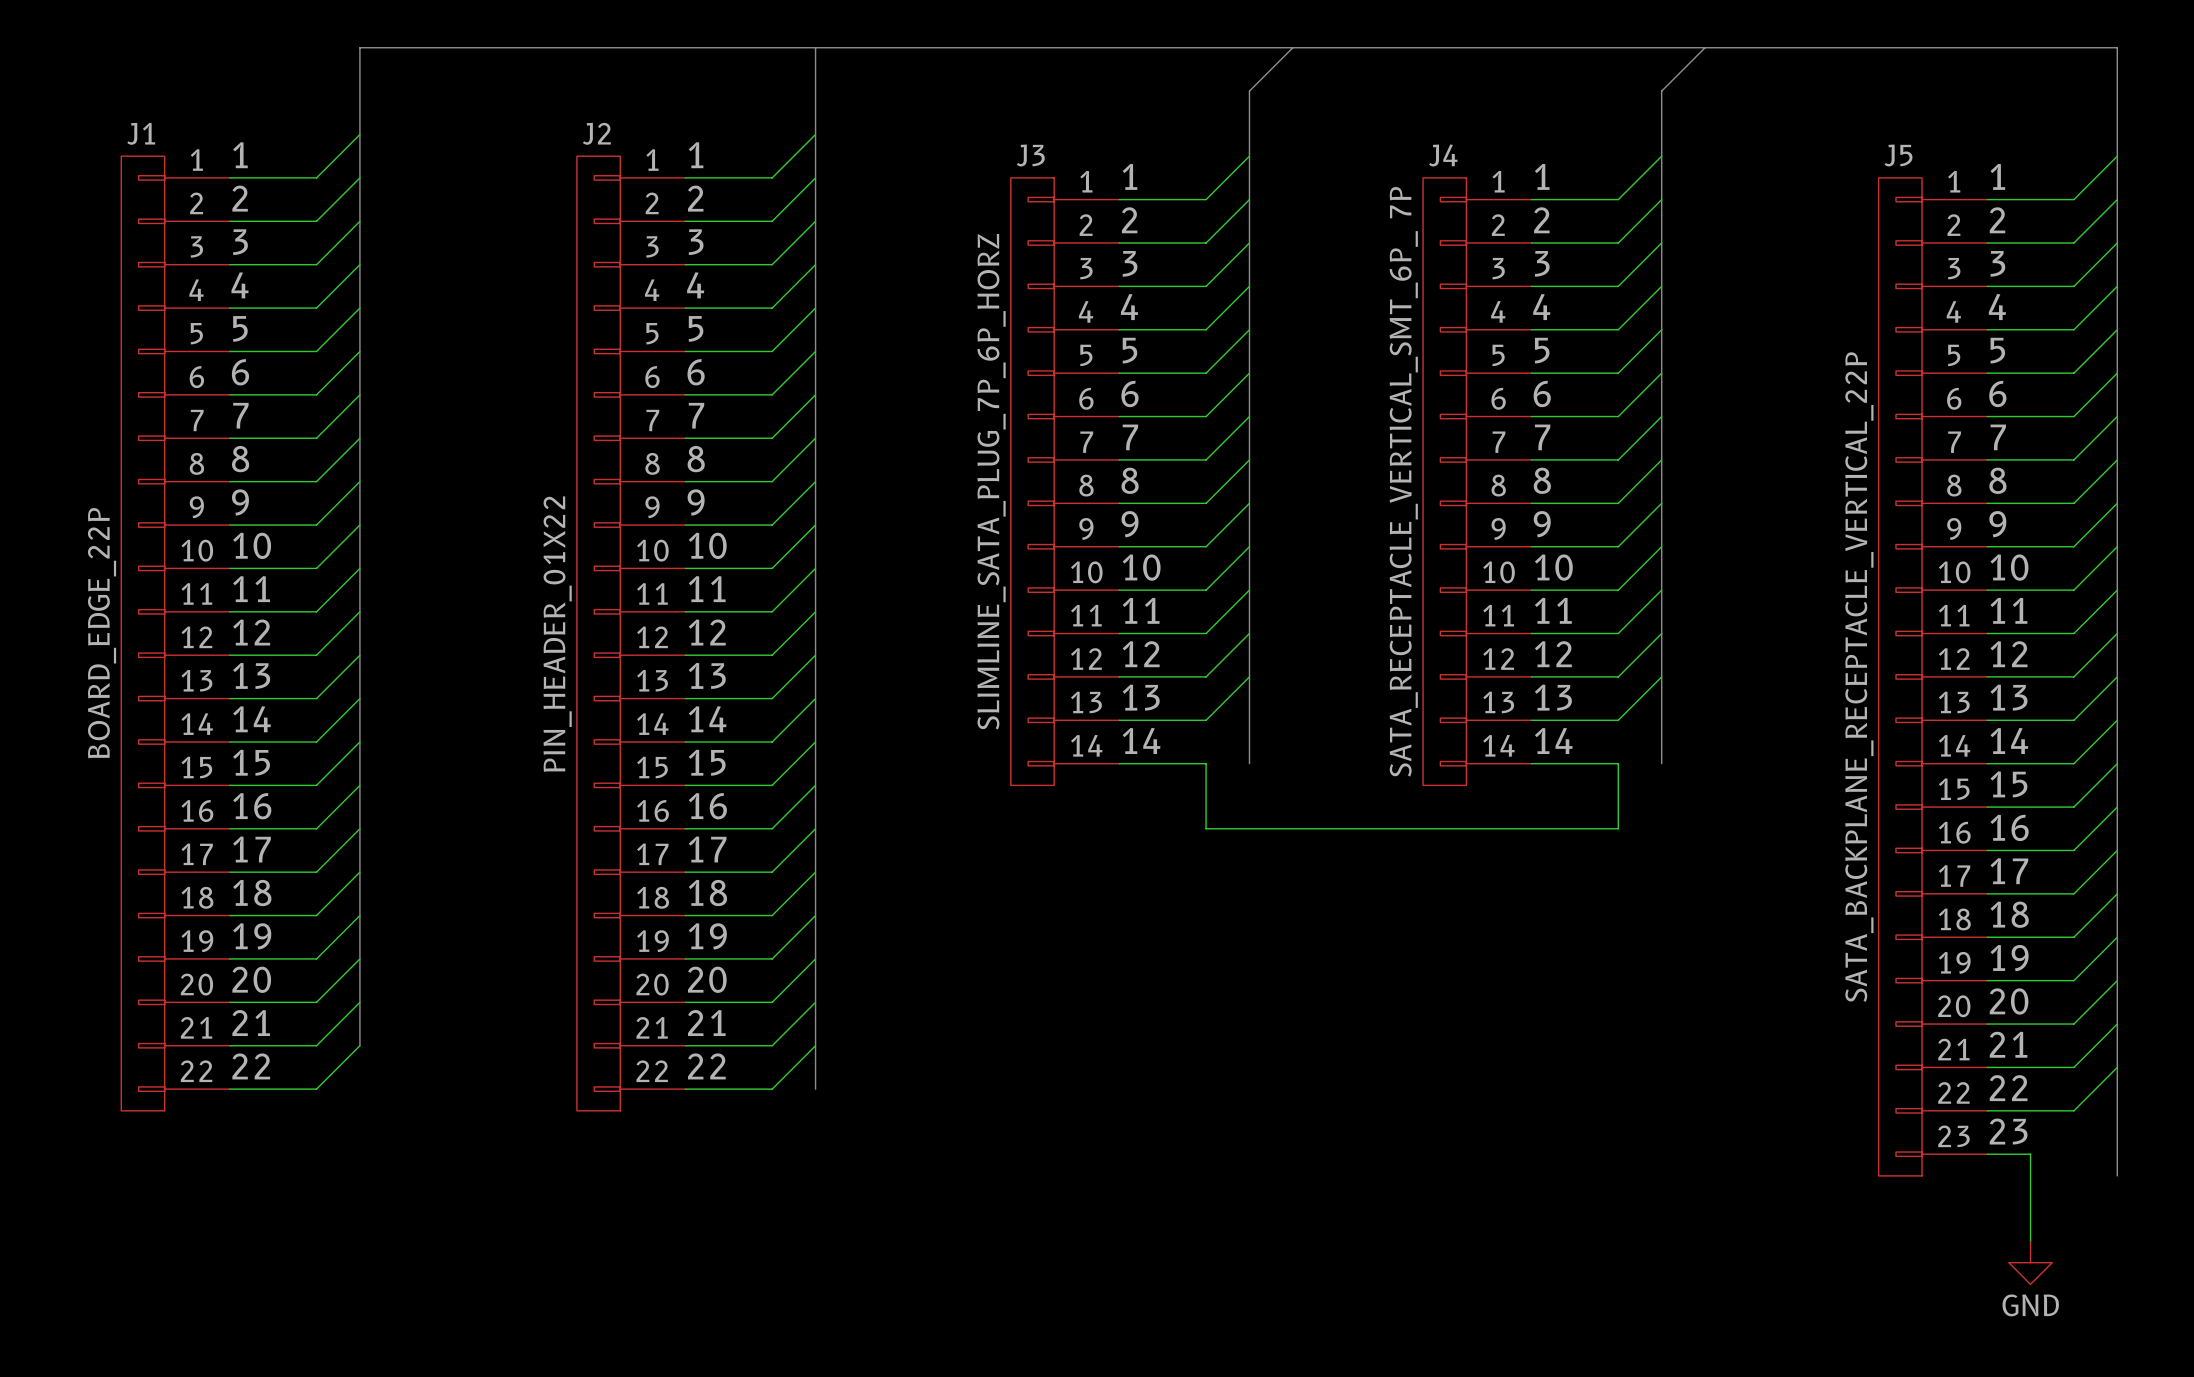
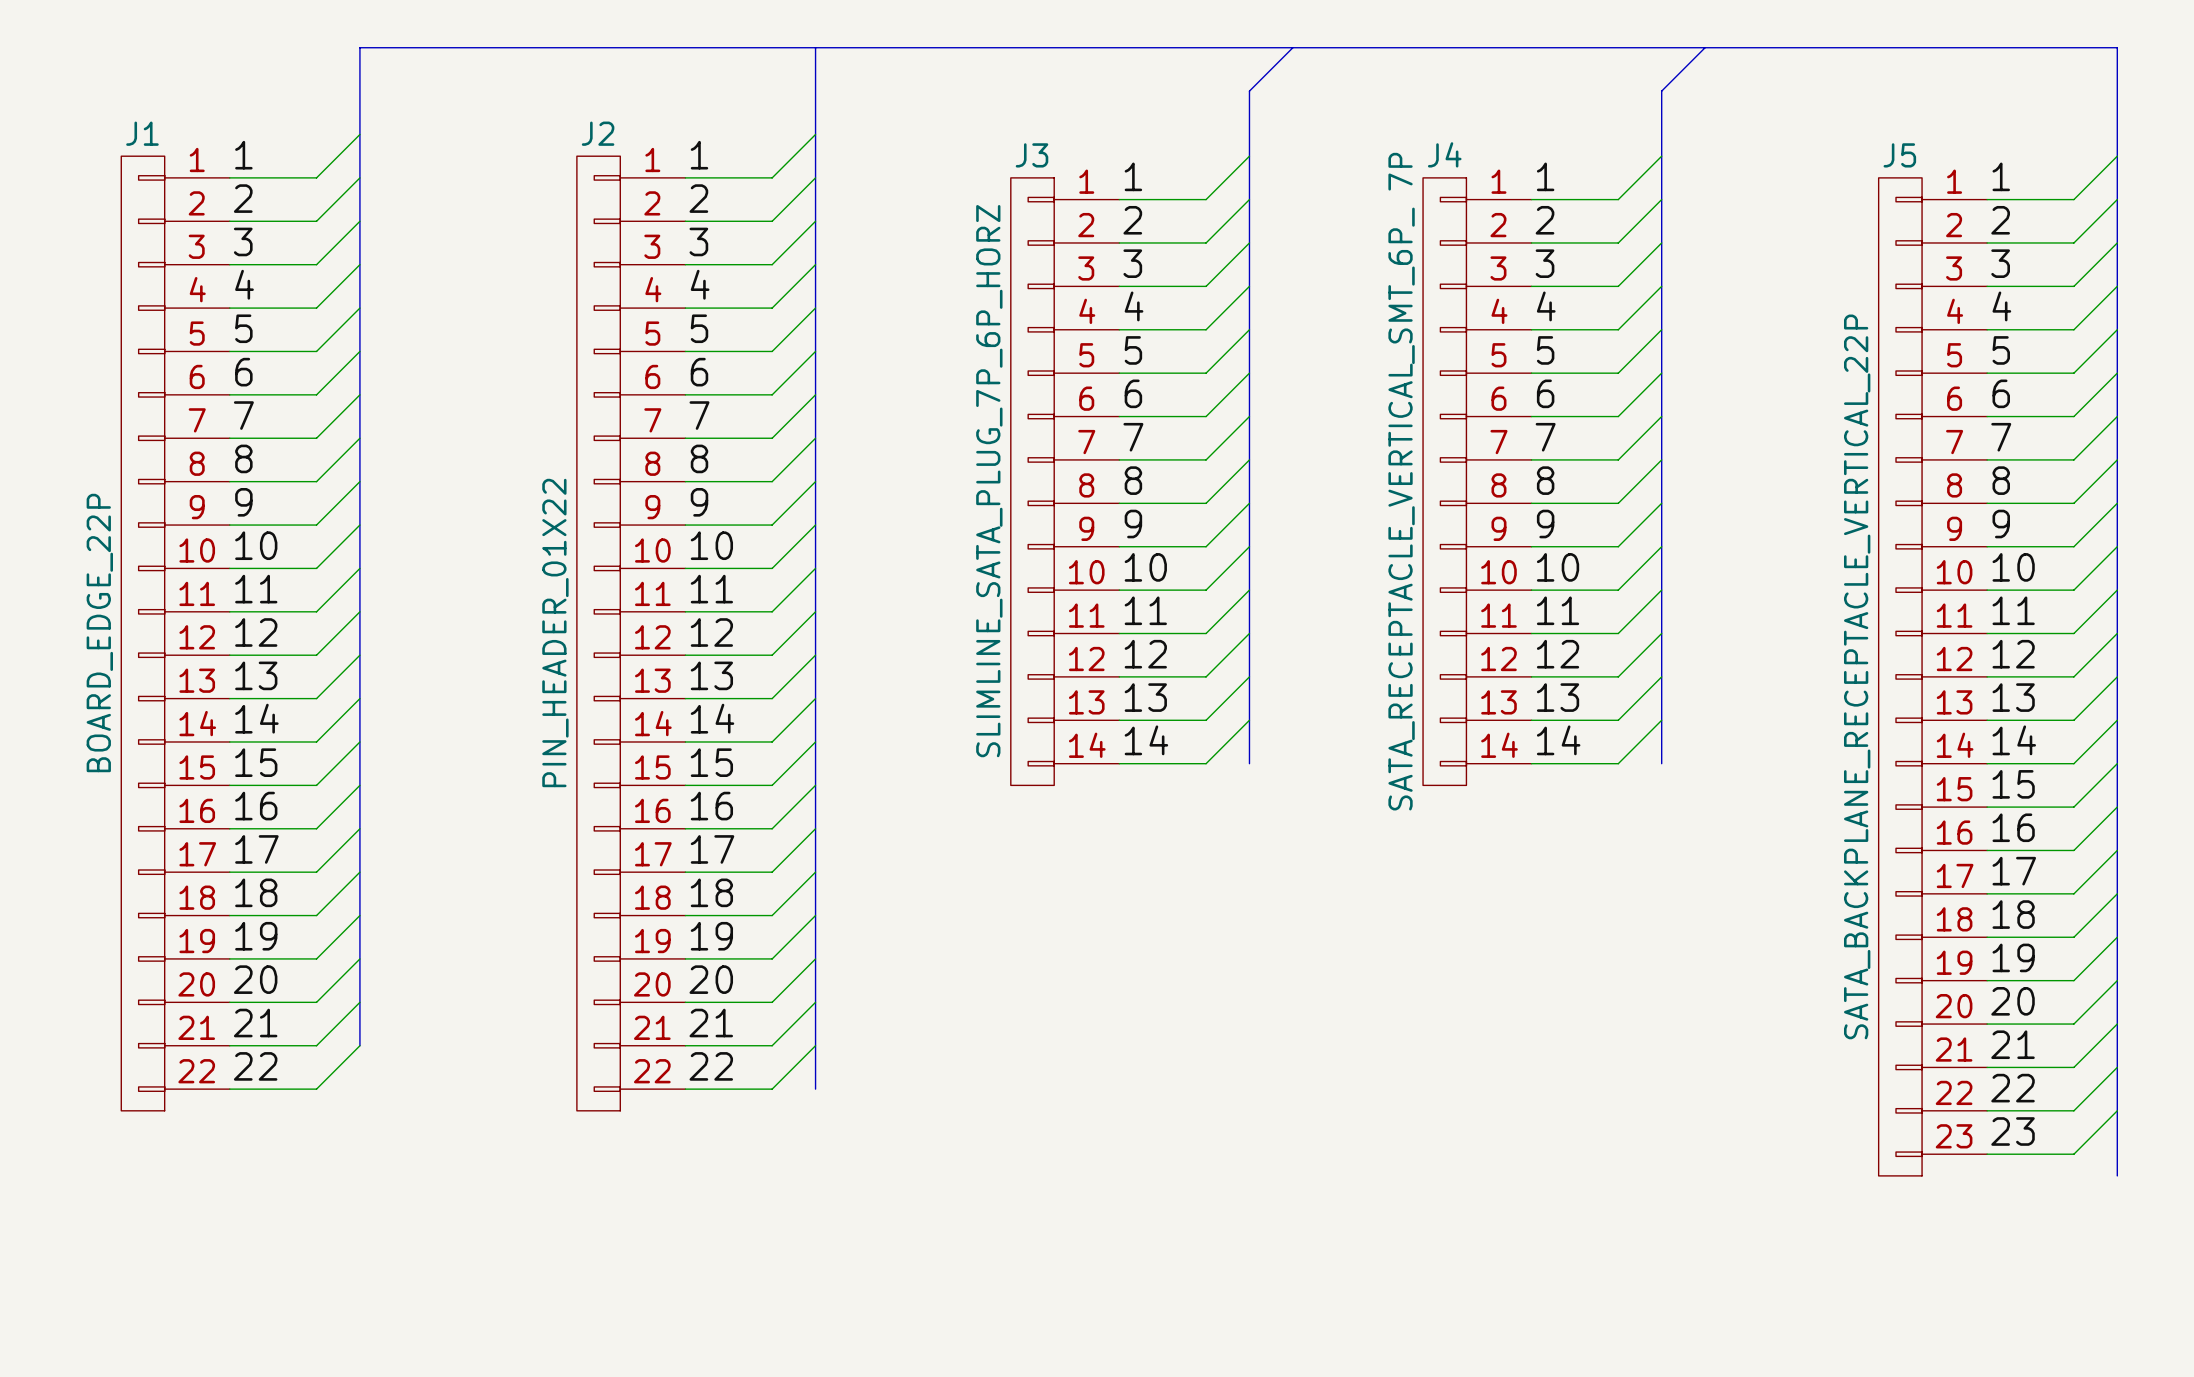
wire: none -> (1661, 720) (1618, 763)
wire: (1206, 763) (1206, 828) (1618, 828) (1618, 763) -> (1206, 763) (1249, 720)
wire: (2030, 1154) (2030, 1240) -> (2030, 1154) (2073, 1154) (2117, 1110)
power symbol: GND (2030, 1262) -> none

